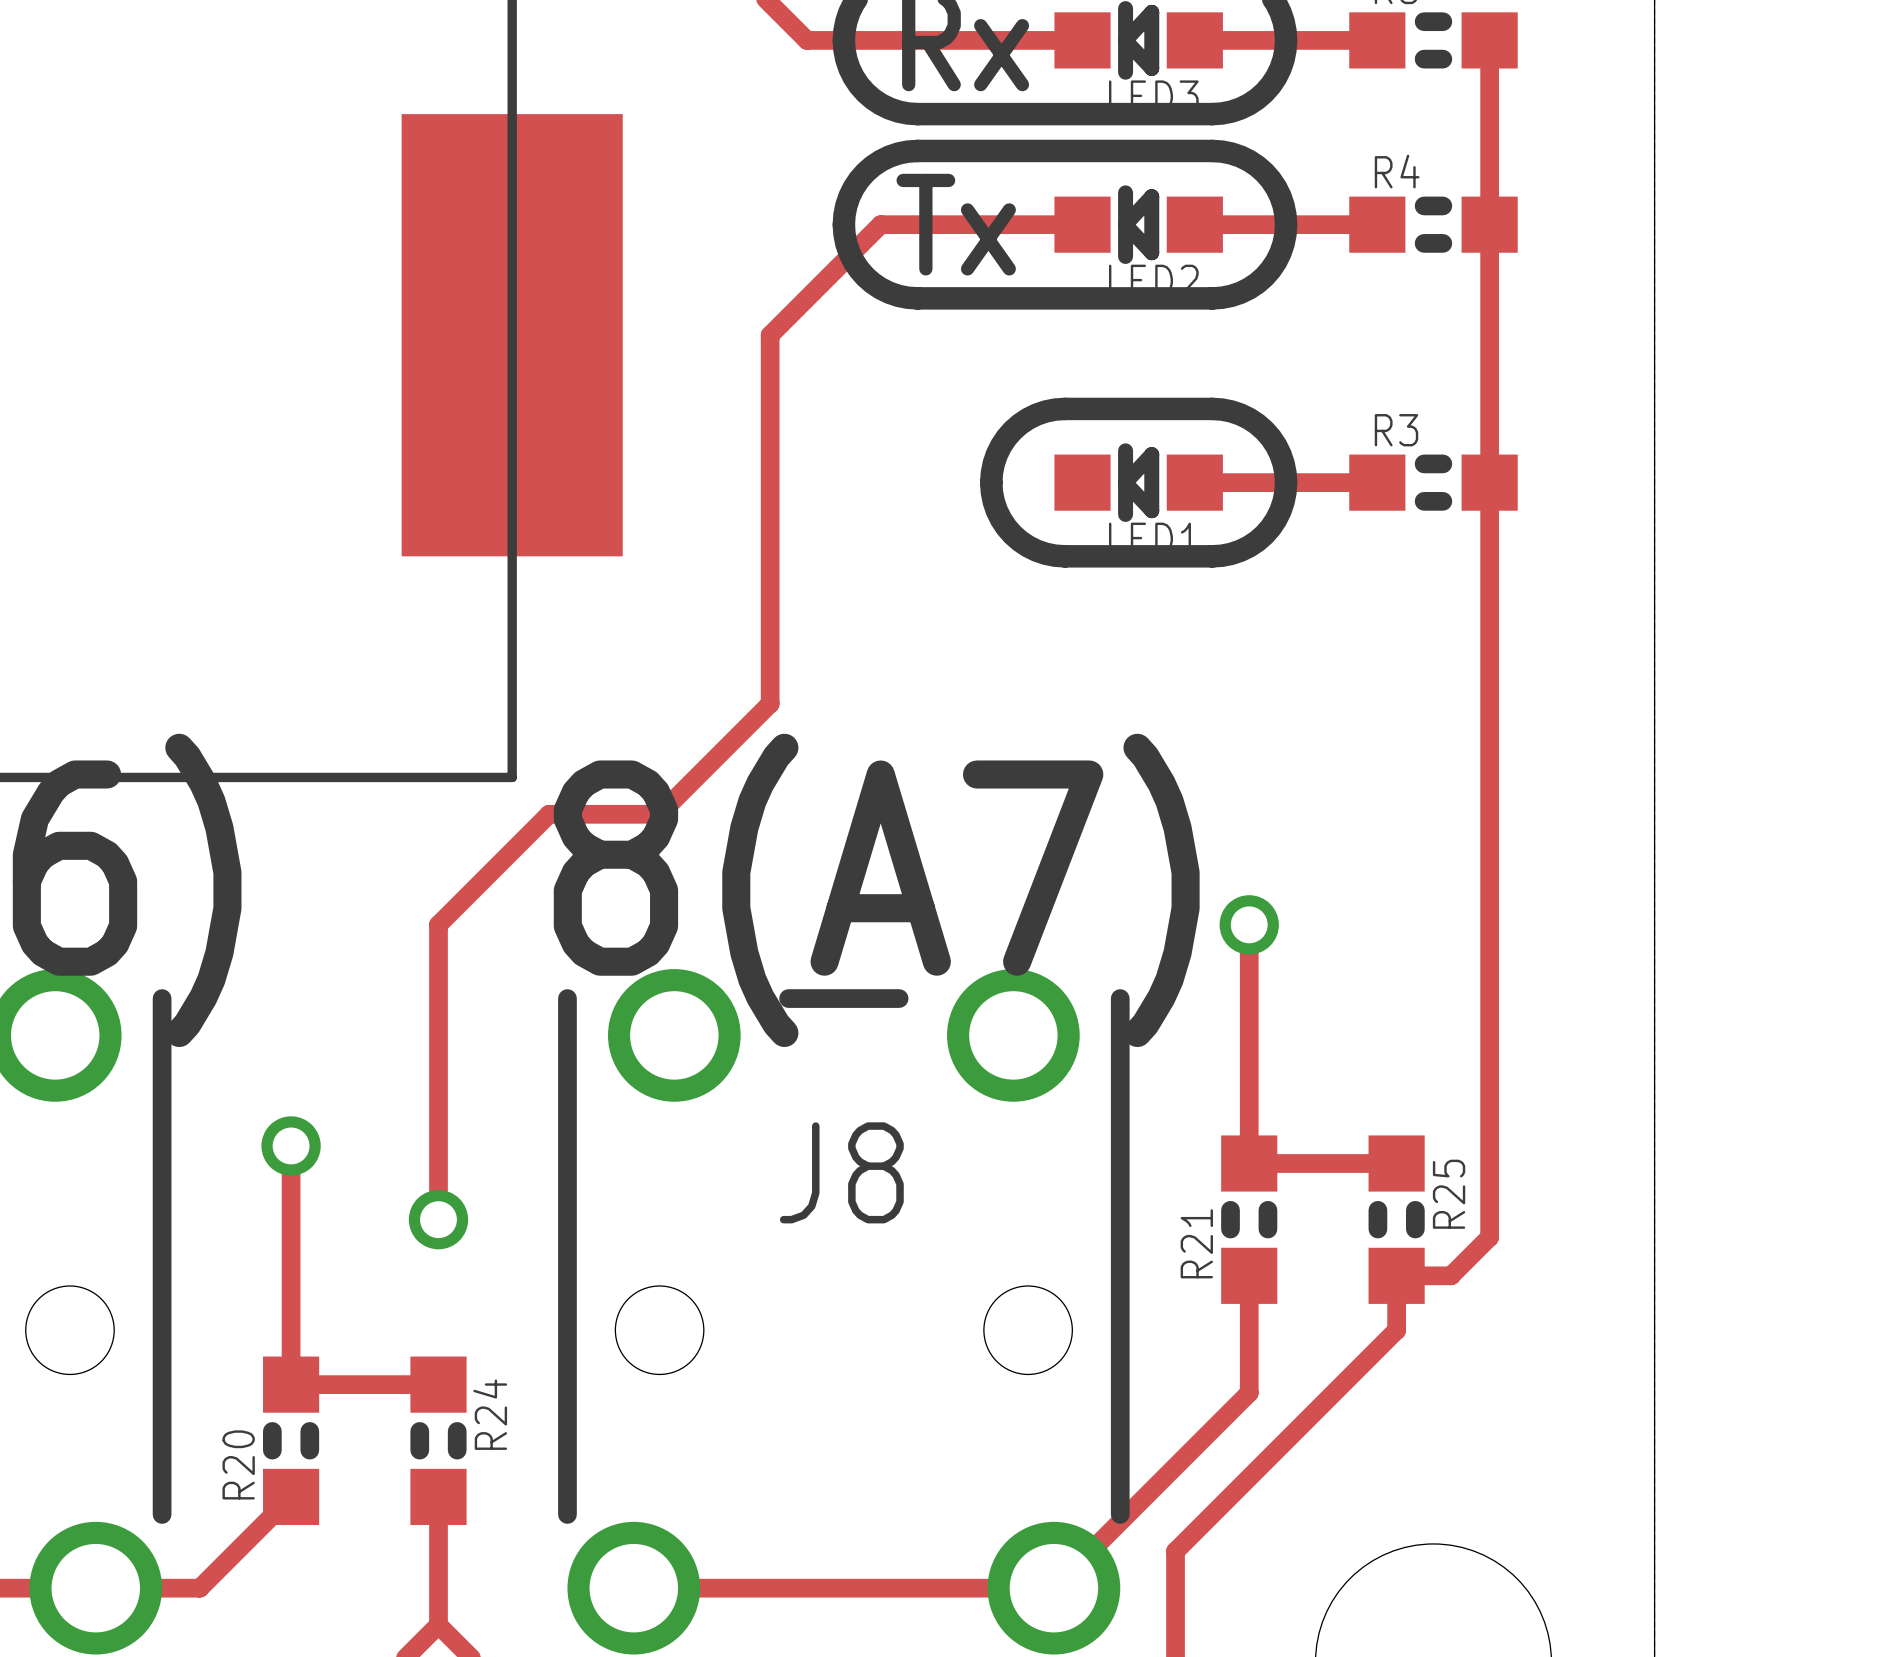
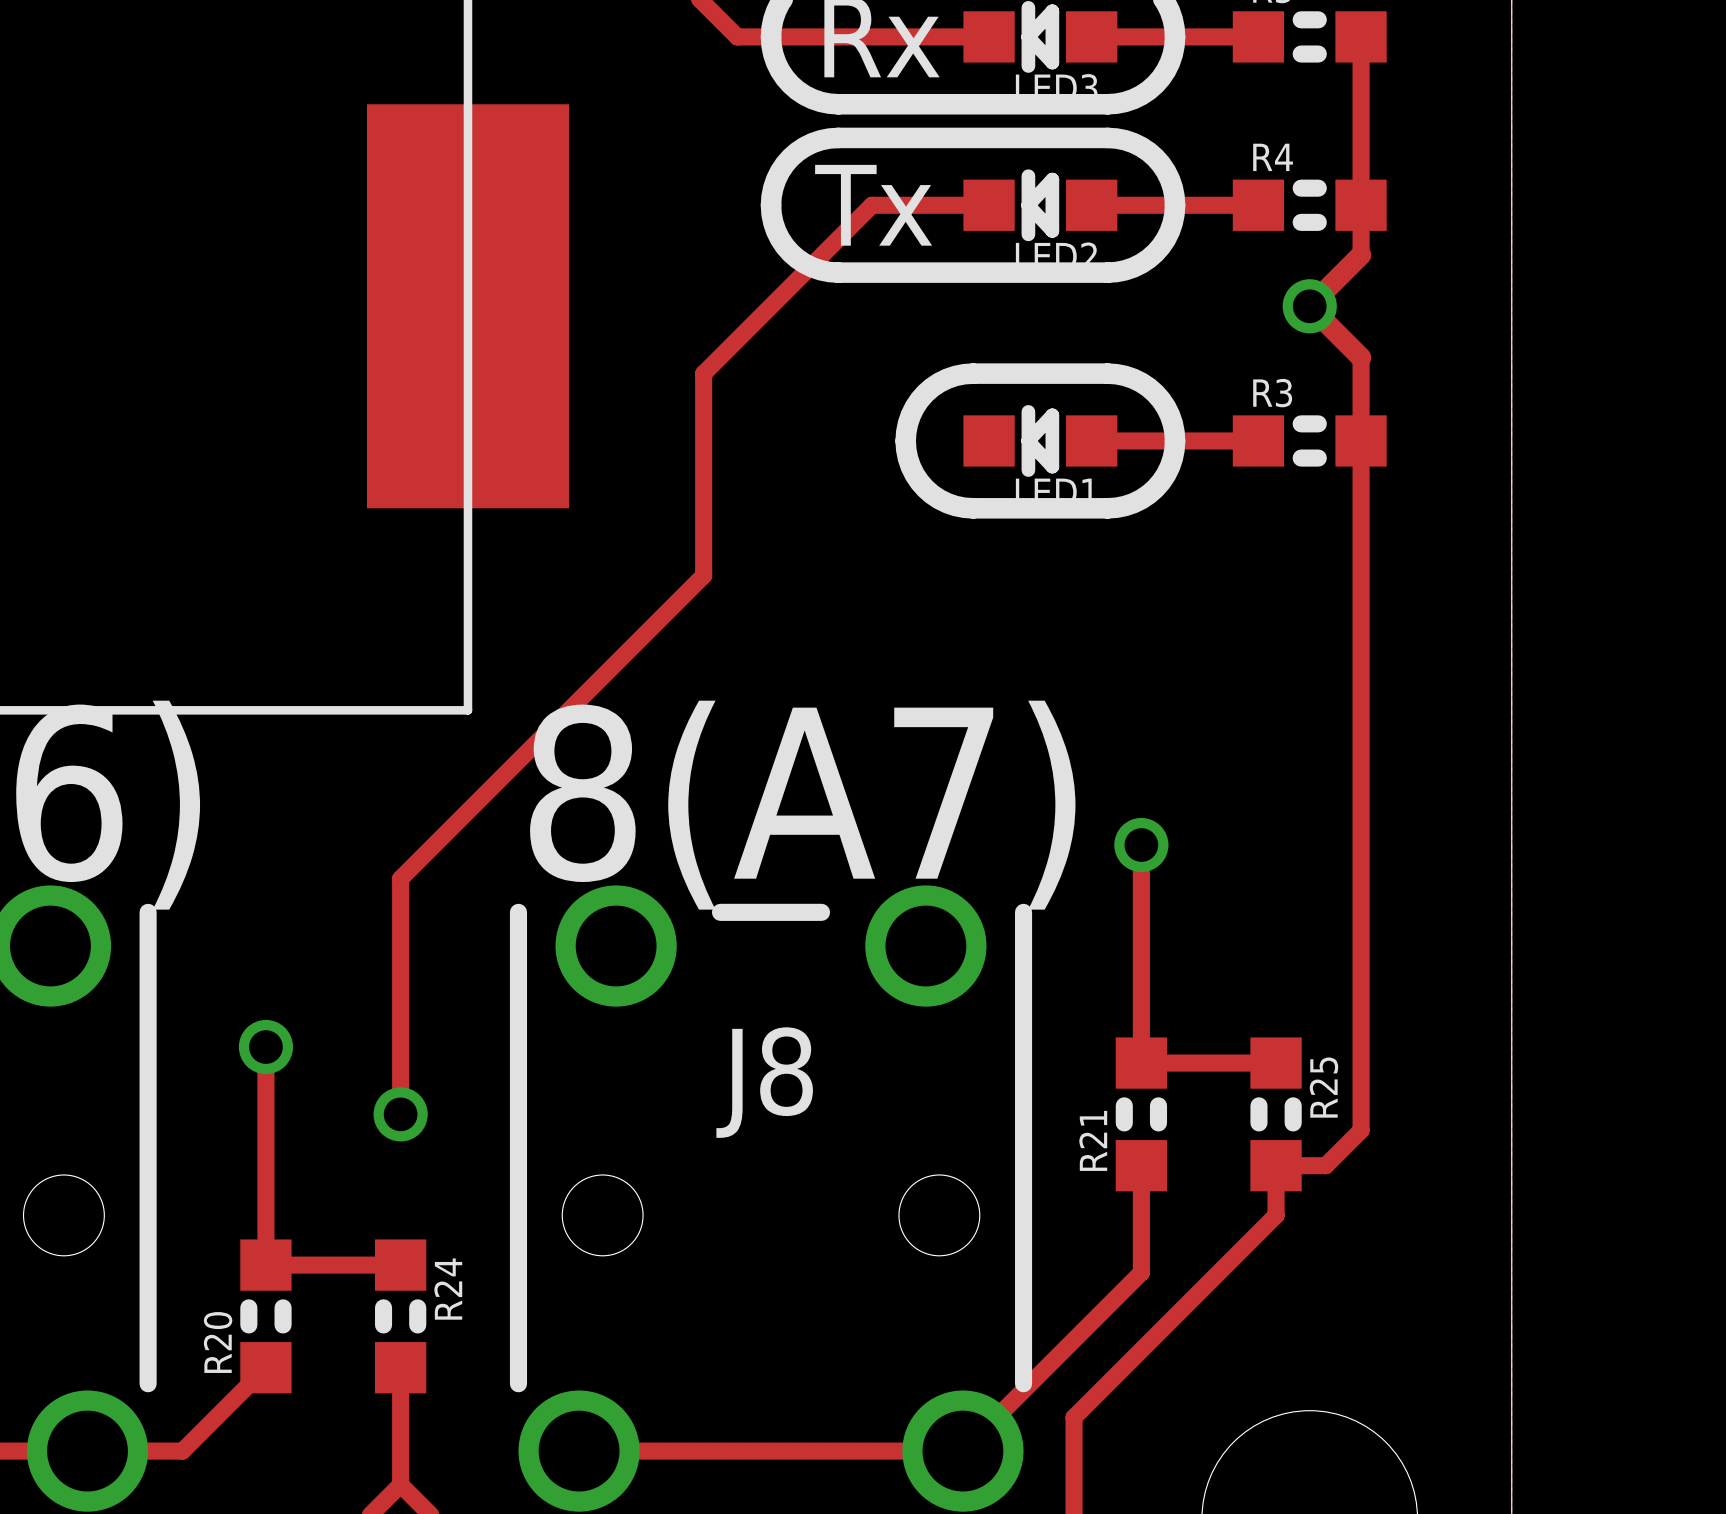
track: (954, 224) (880, 224) (770, 335) (770, 408) -> (872, 205) (703, 373)
track: (1489, 279) (1489, 391) -> (1361, 254) (1309, 306) (1361, 357)
via: none -> (1309, 306)
track: (770, 630) (770, 703) (659, 814) (549, 814) (438, 924) (438, 961) -> (703, 575) (400, 878)

